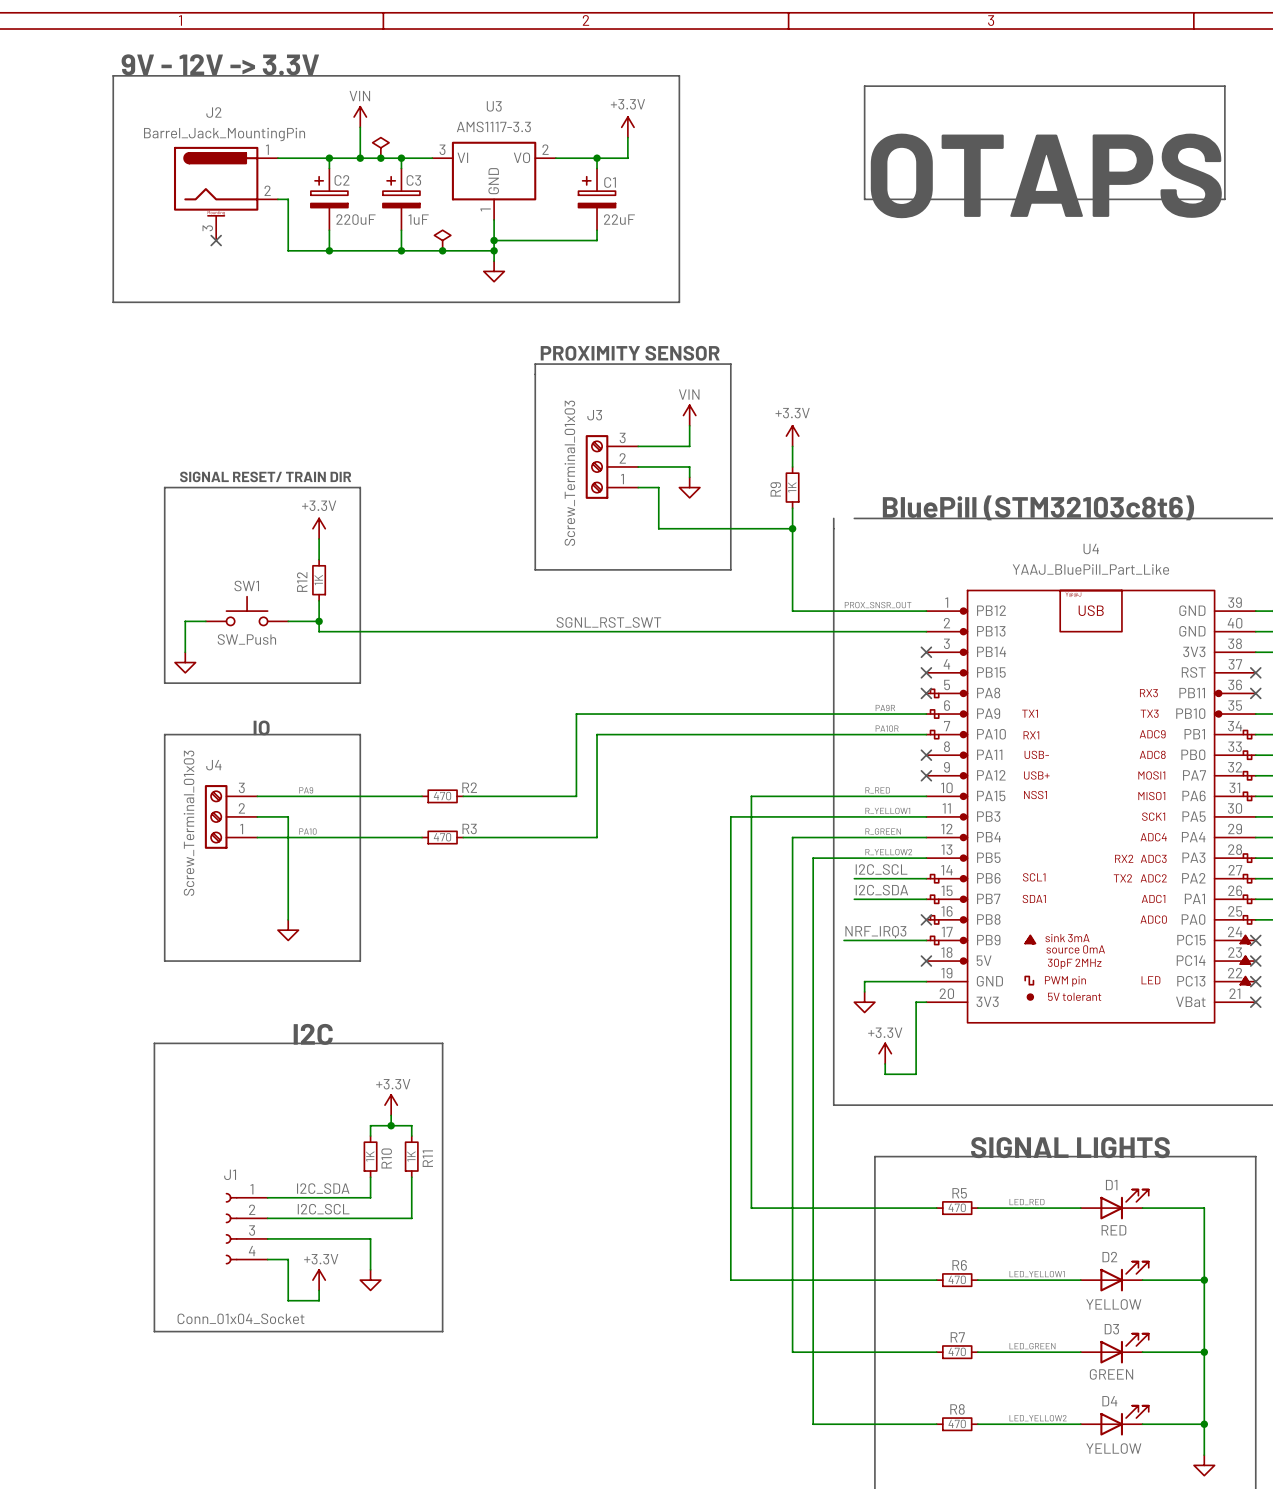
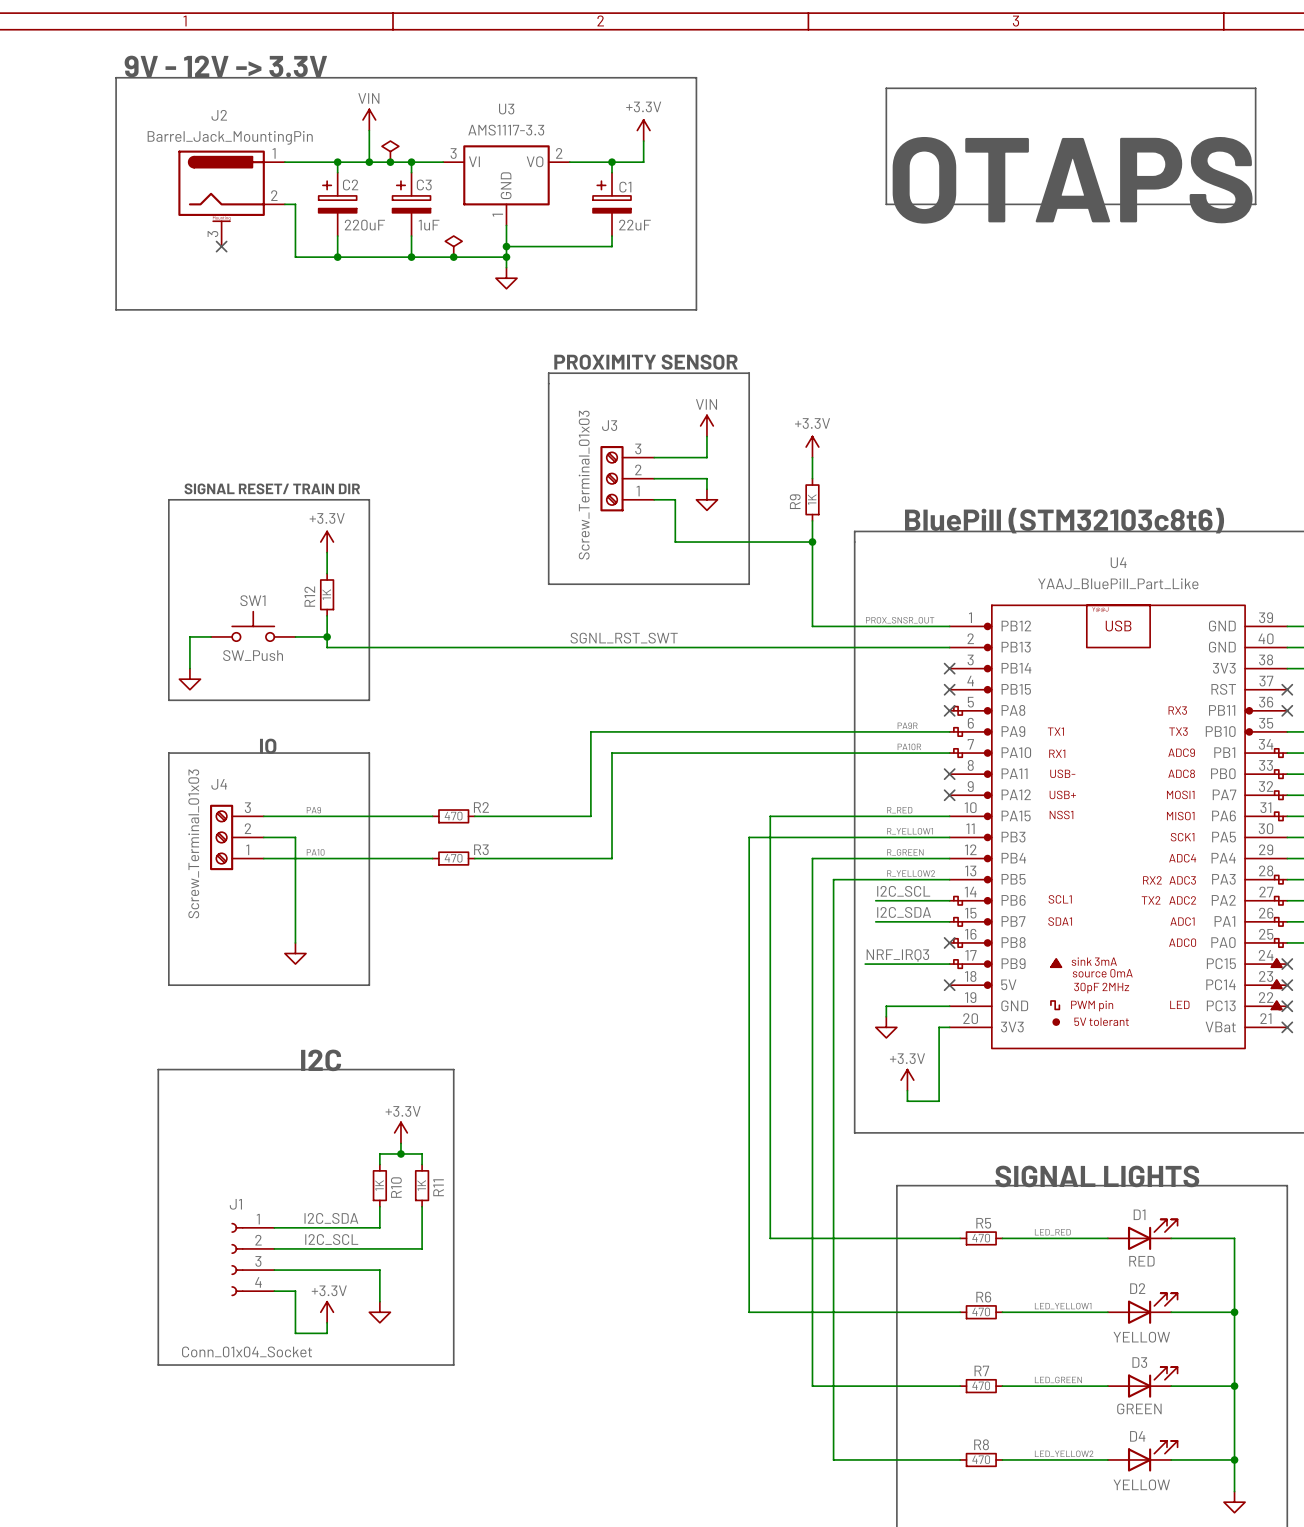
line: none -> (854, 531) (875, 531)

